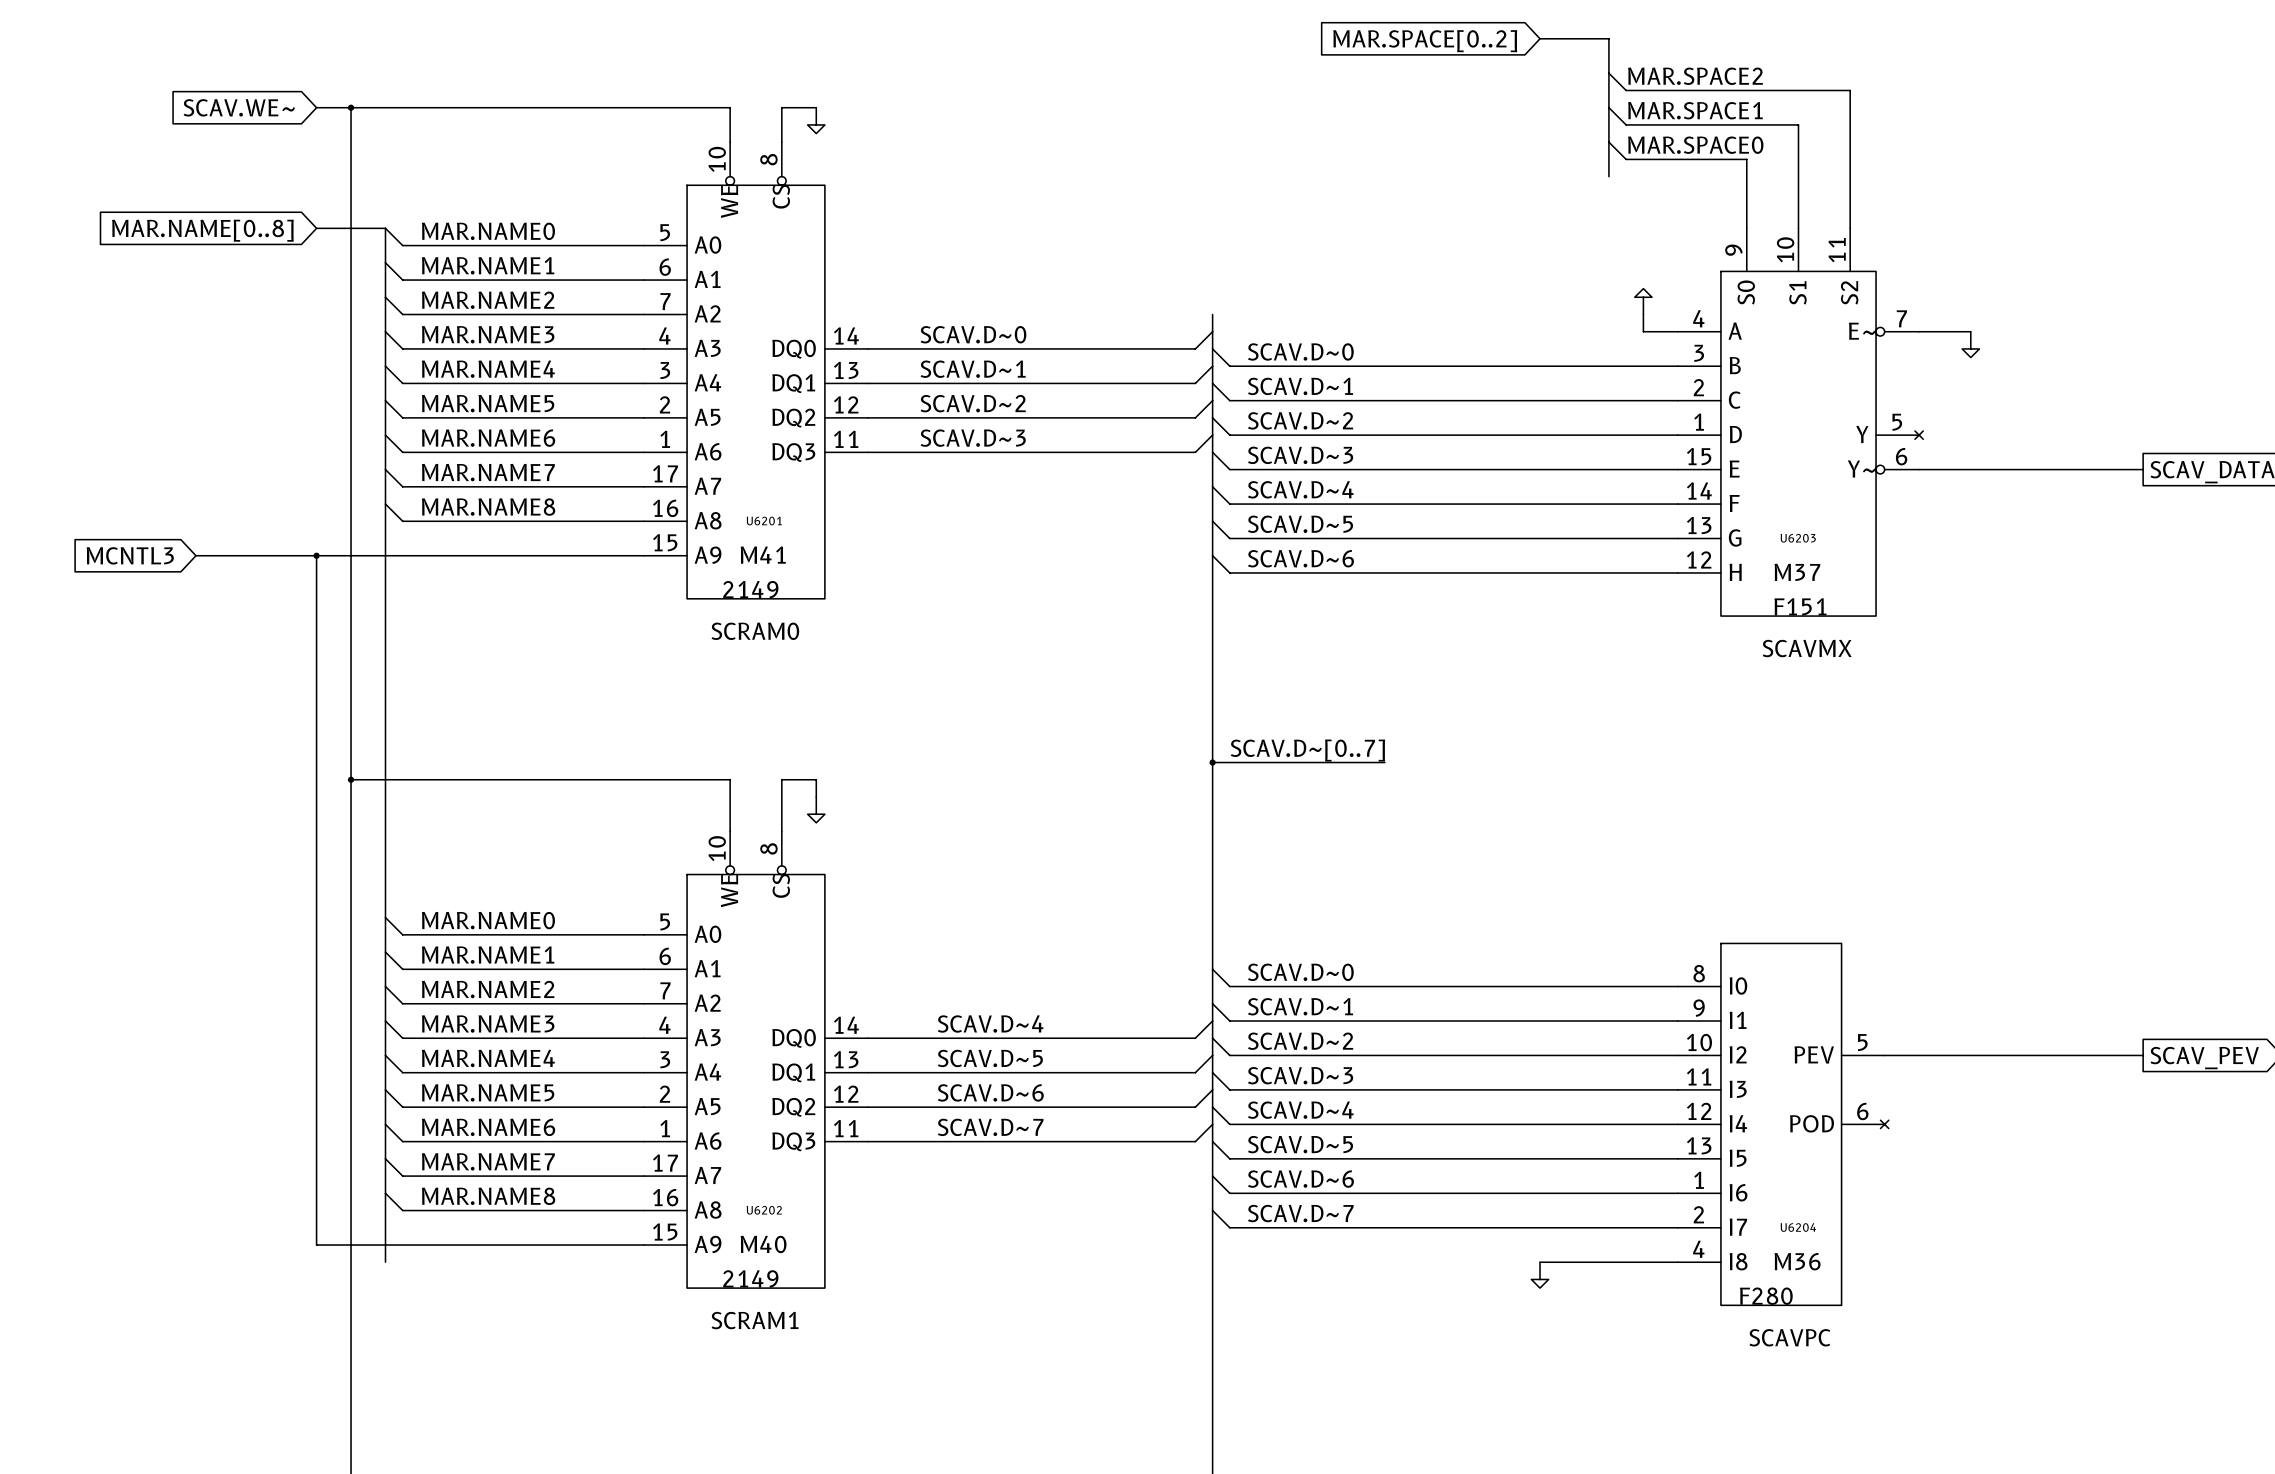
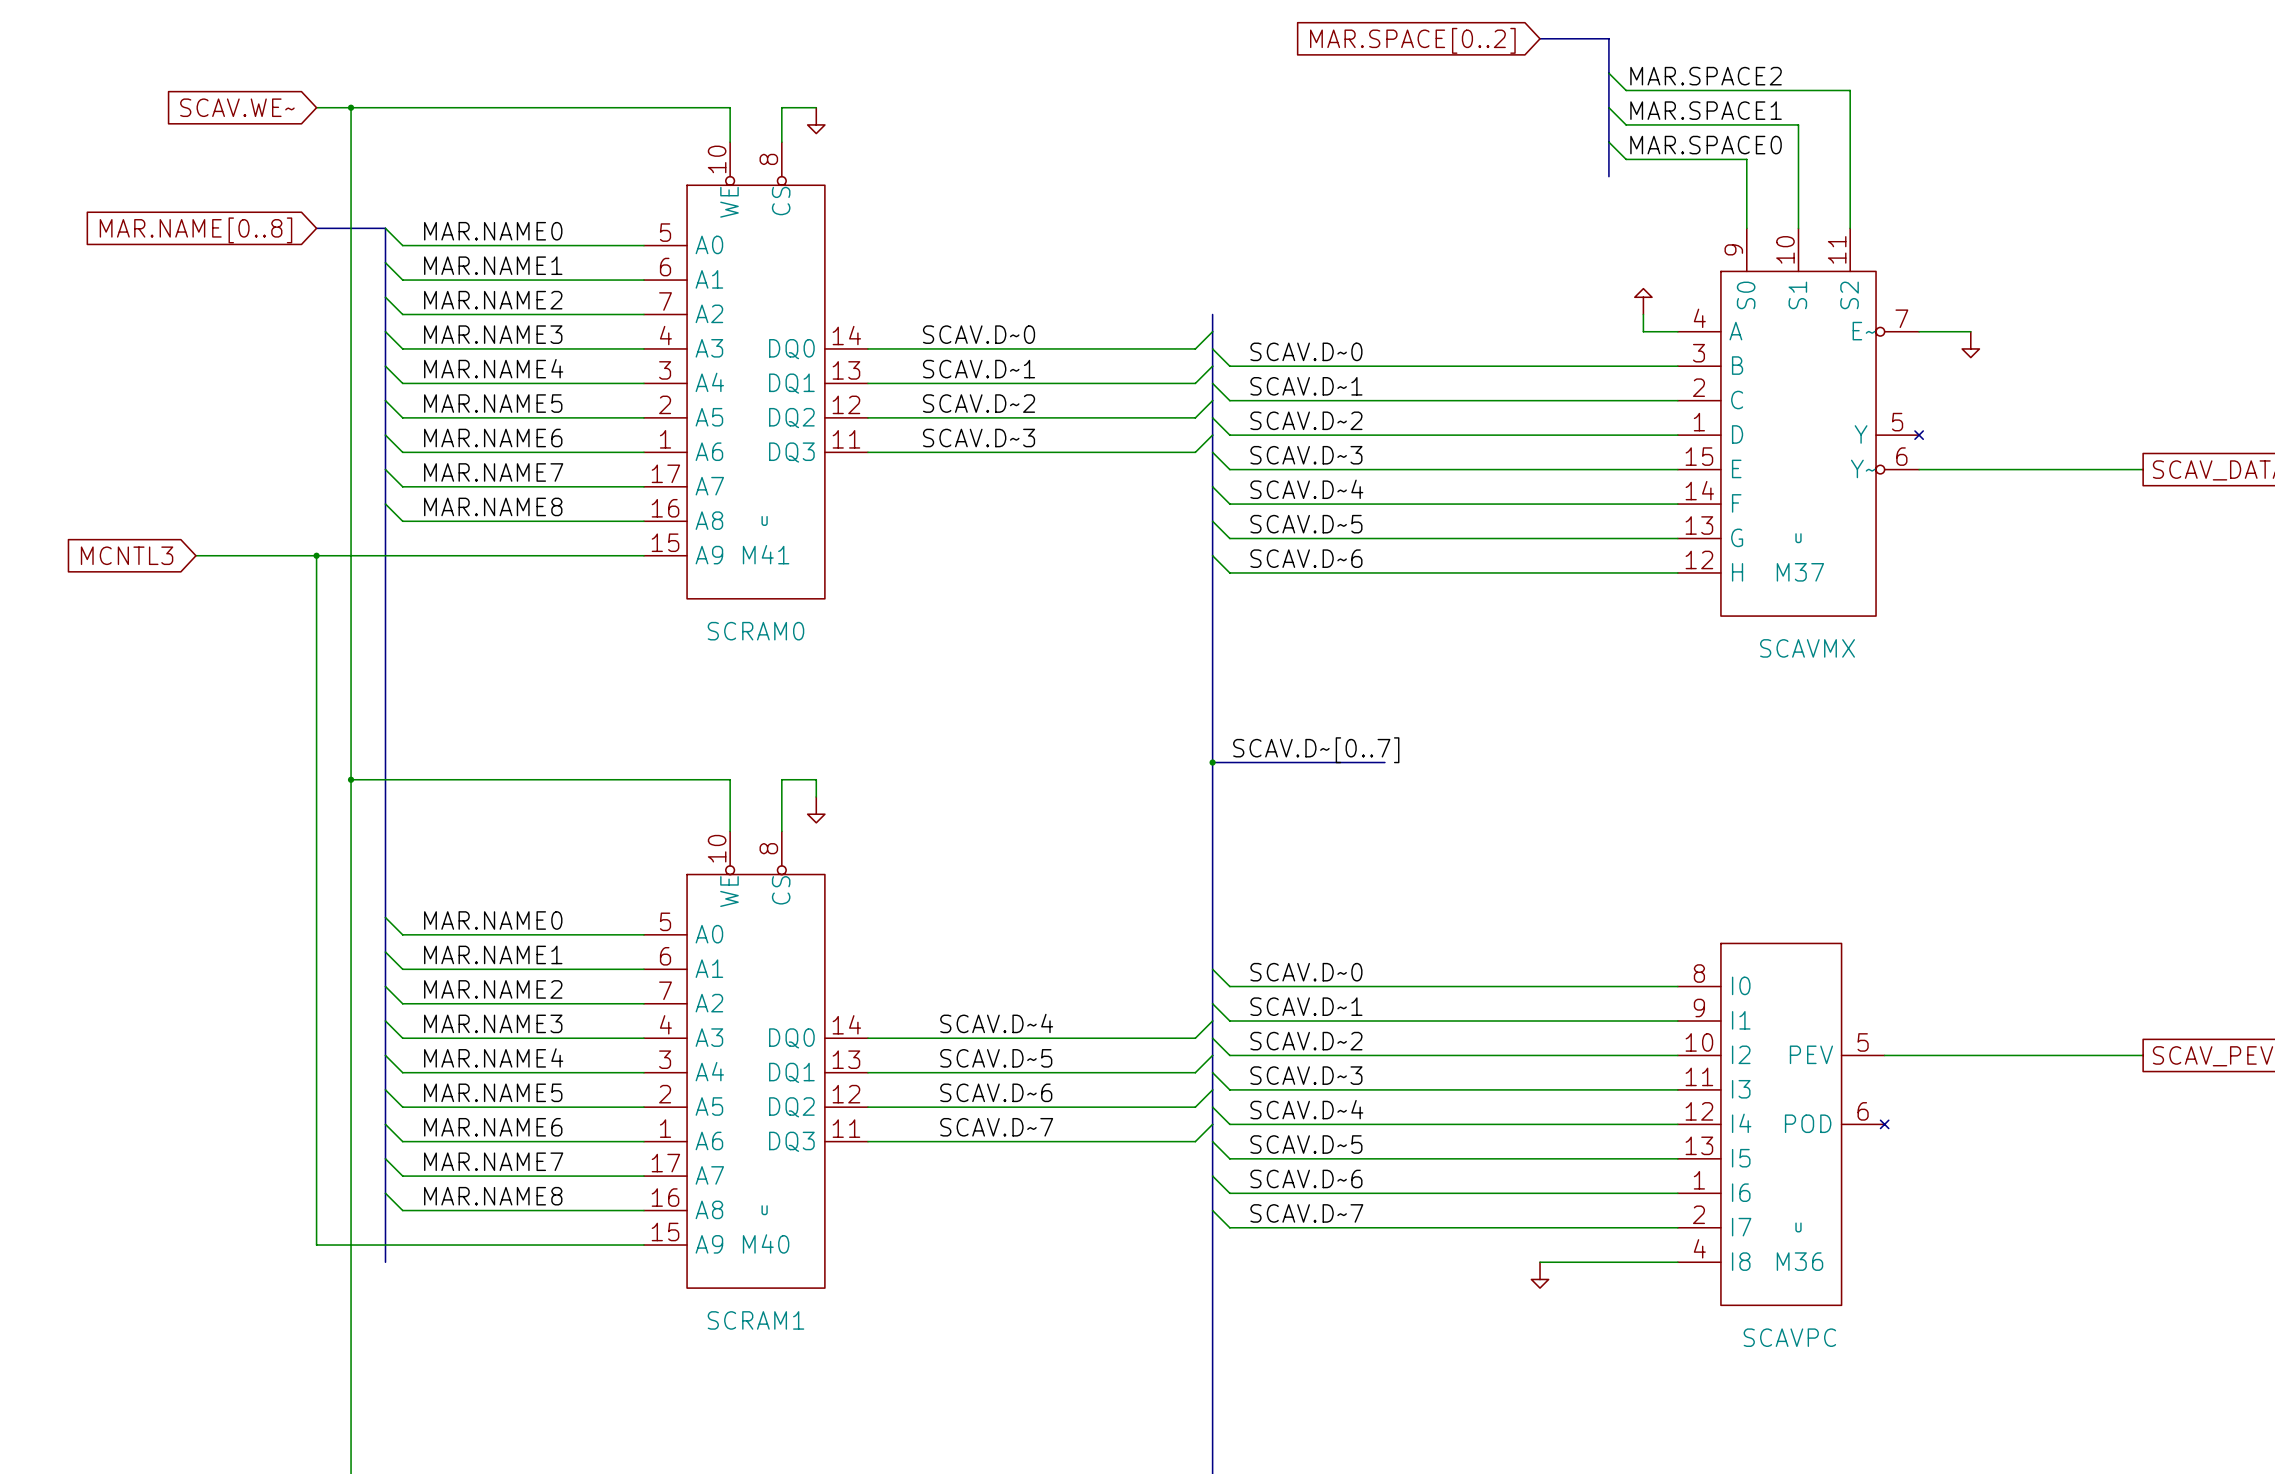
U6201 name: U6201 (764, 521) -> U (764, 520)
U6203 name: U6203 (1798, 538) -> U (1798, 538)
U6201 value: 2149 (750, 589) -> none
U6203 value: F151 (1800, 606) -> none
U6202 name: U6202 (764, 1210) -> U (764, 1210)
U6204 name: U6204 (1798, 1227) -> U (1798, 1227)
U6202 value: 2149 (750, 1278) -> none
U6204 value: F280 (1766, 1296) -> none

